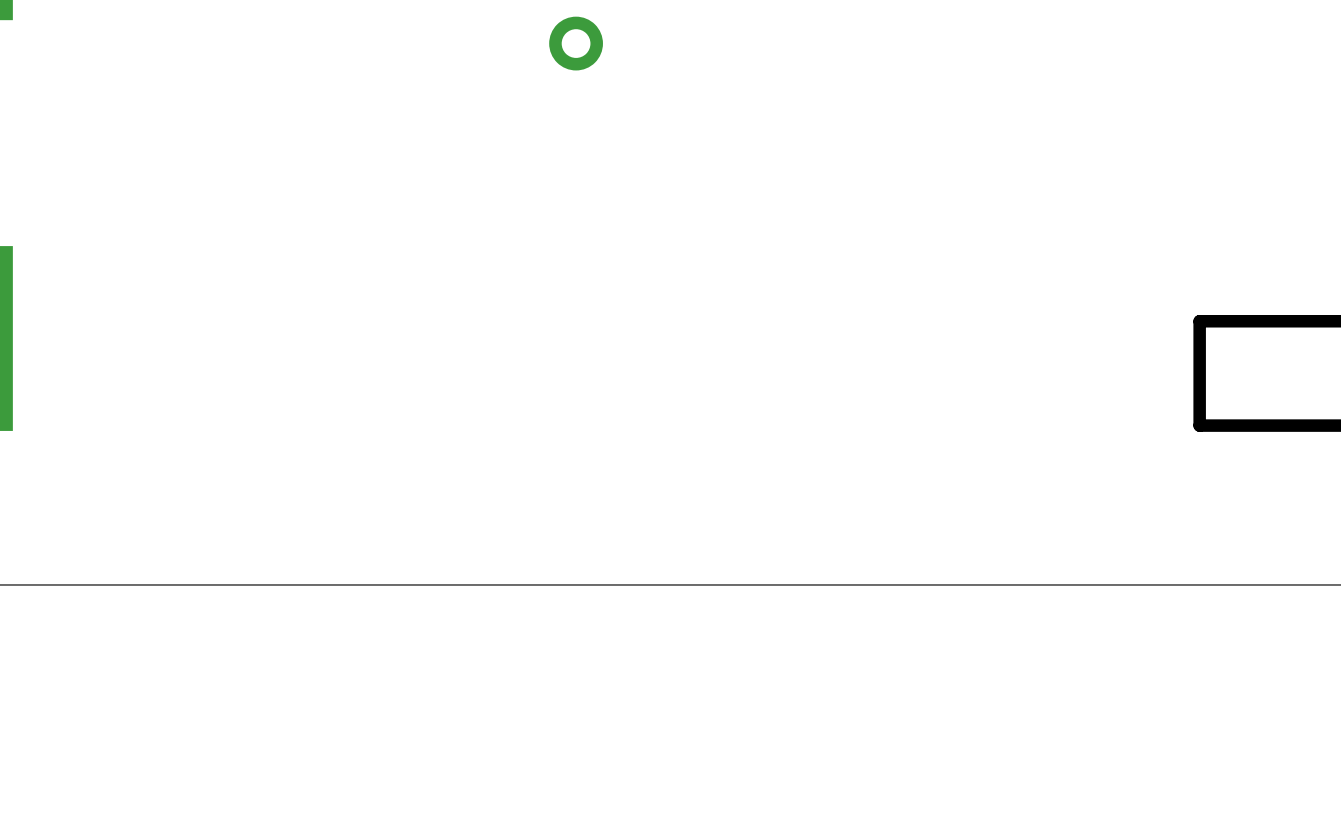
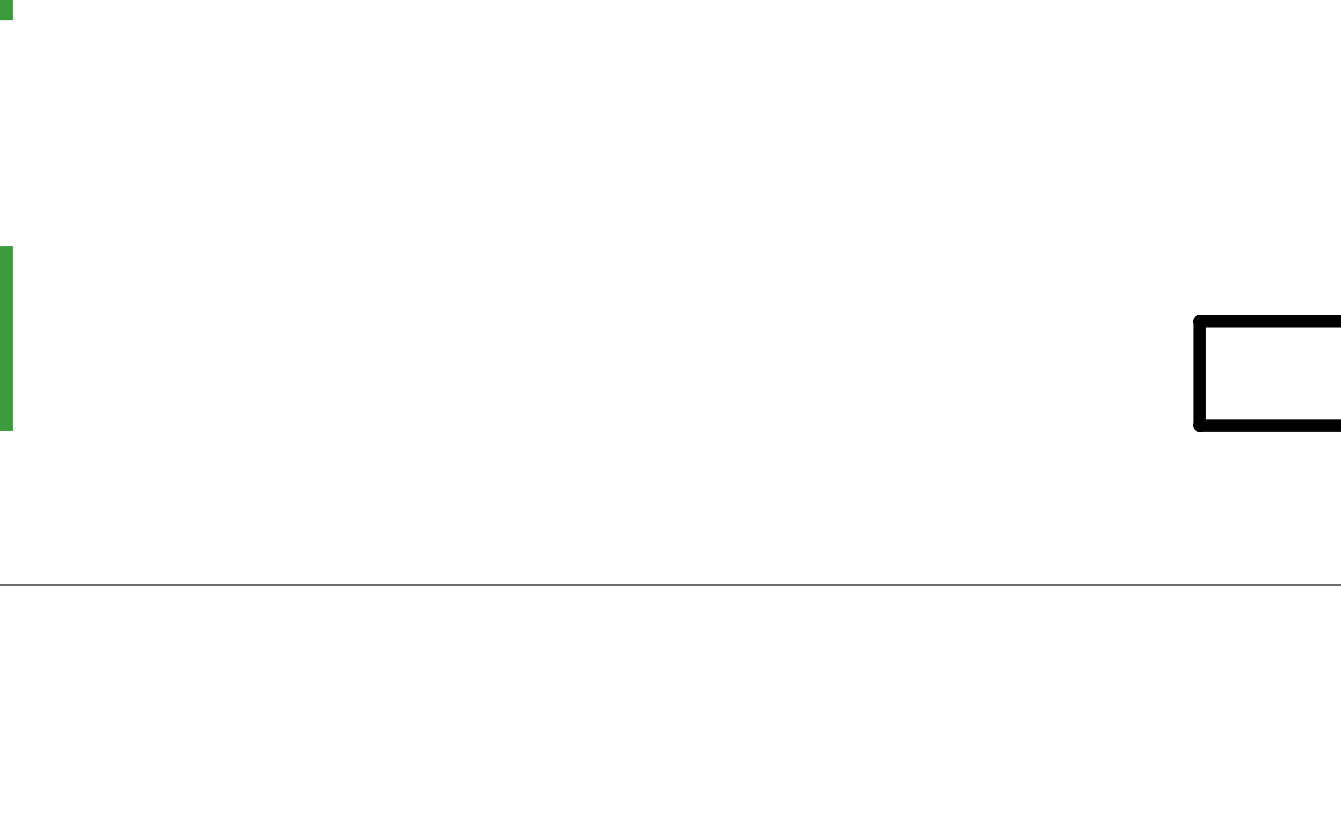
via: (576, 43) -> none

